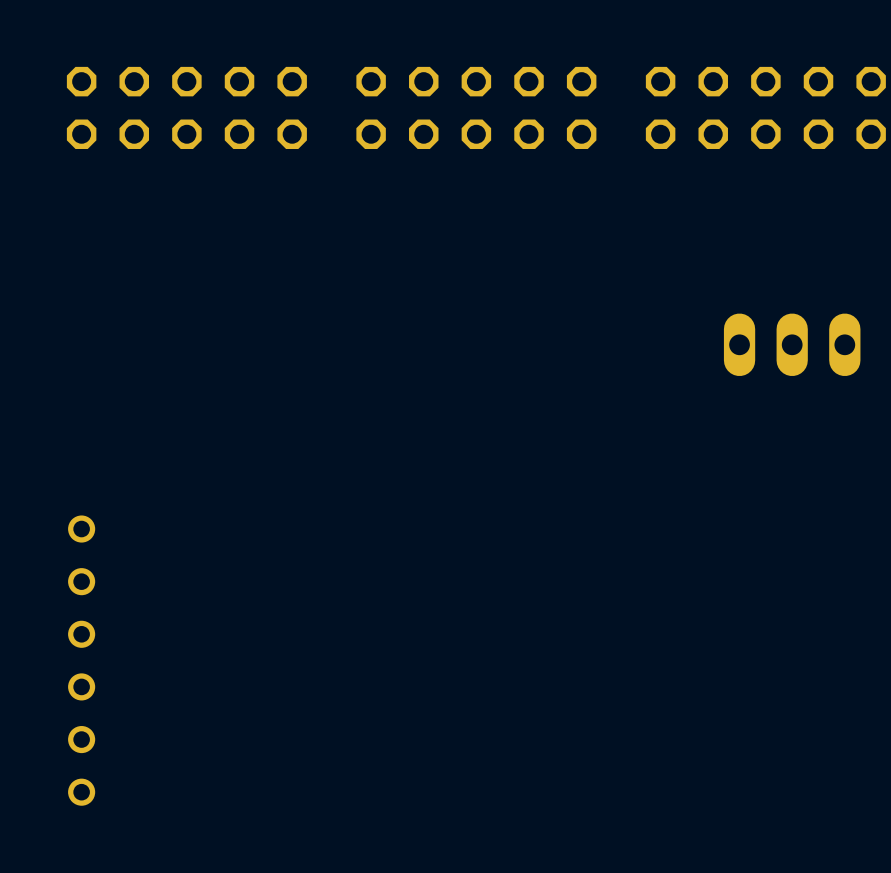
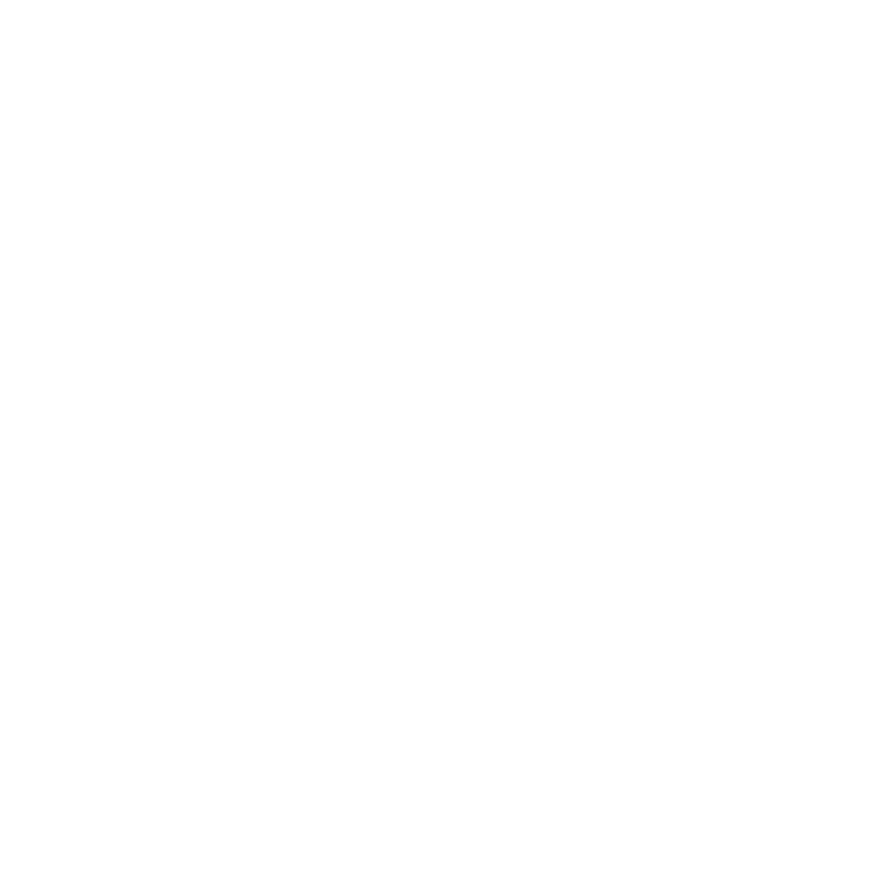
part: (186, 107) -> none
part: (476, 107) -> none
part: (765, 107) -> none
part: (792, 344) -> none
part: (81, 660) -> none

